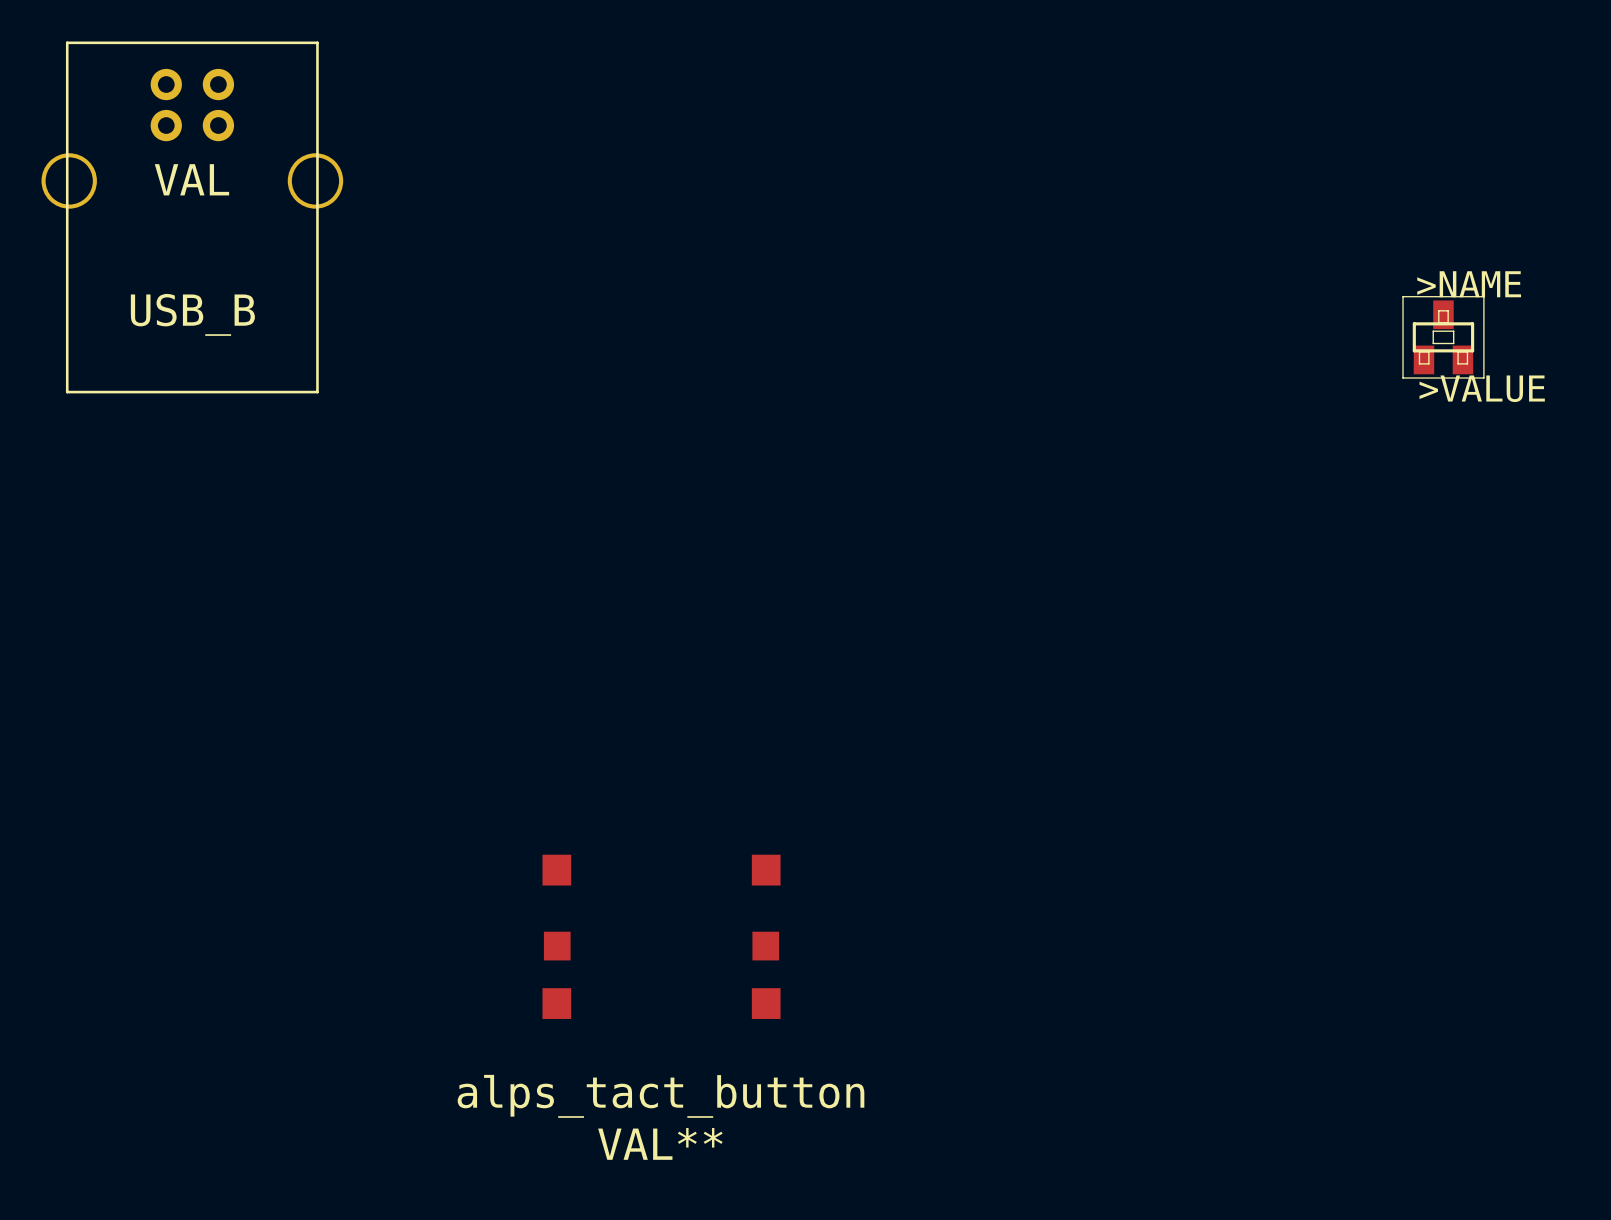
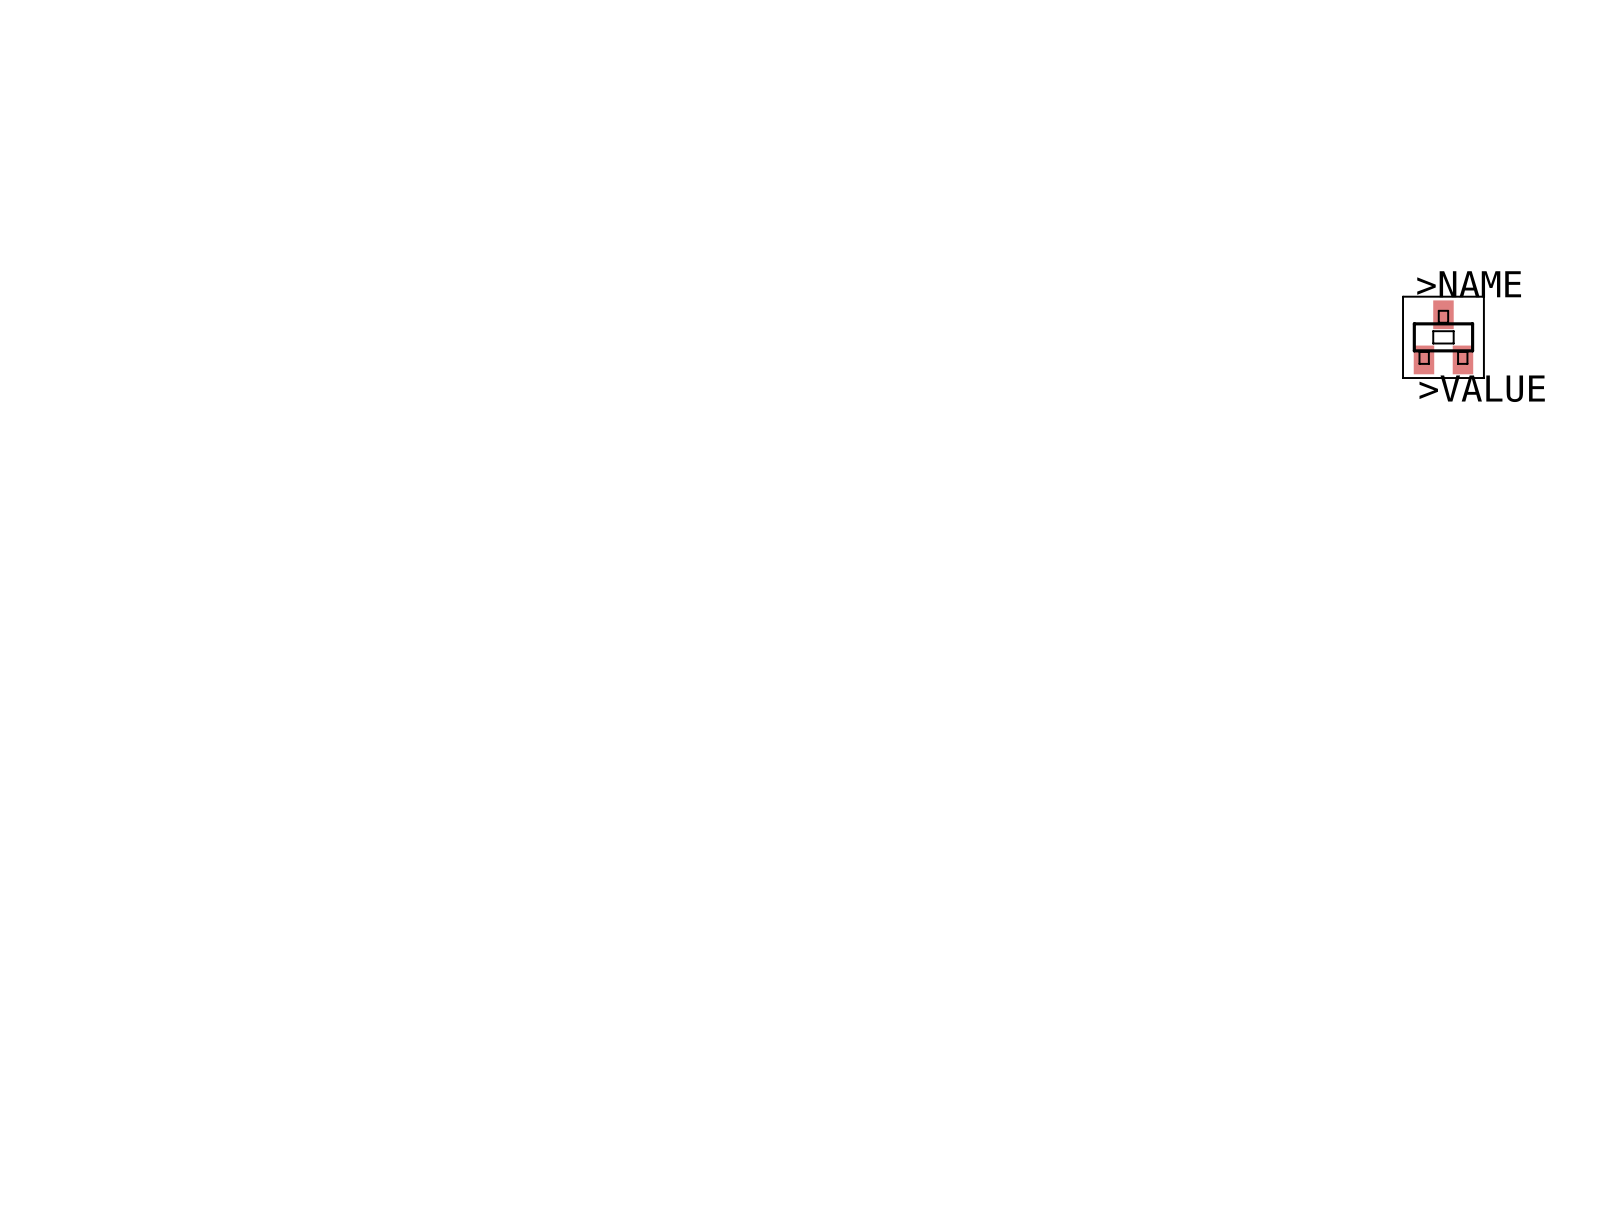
USB_B: VAL (192, 217) -> none
alps_tact_button: VAL** (661, 936) -> none

